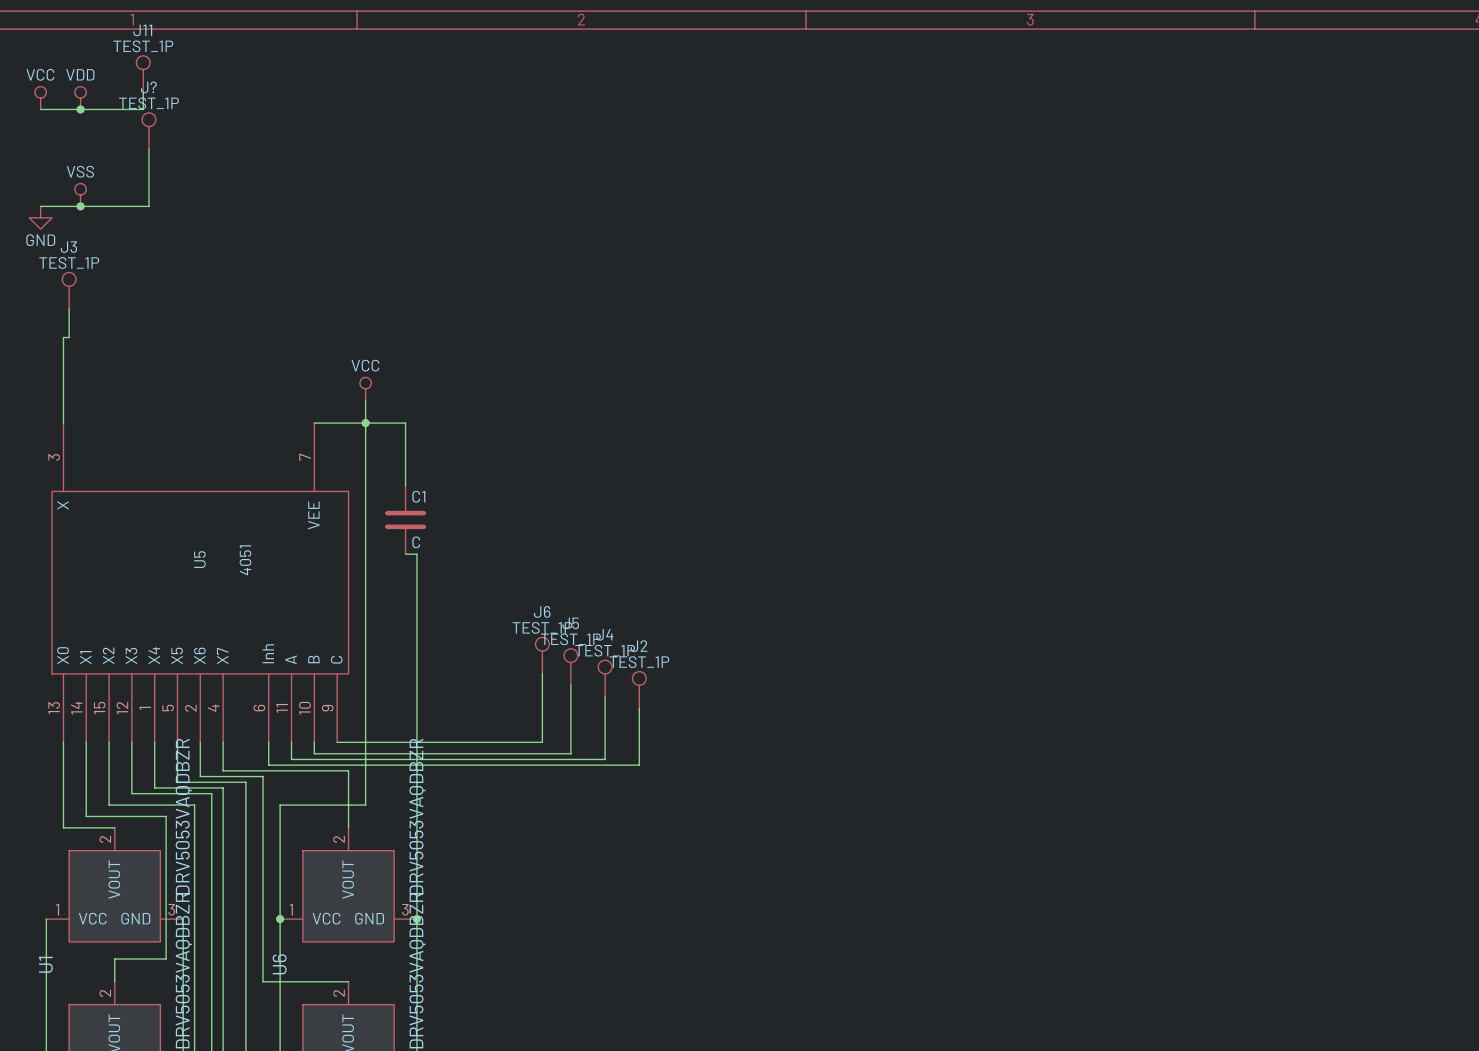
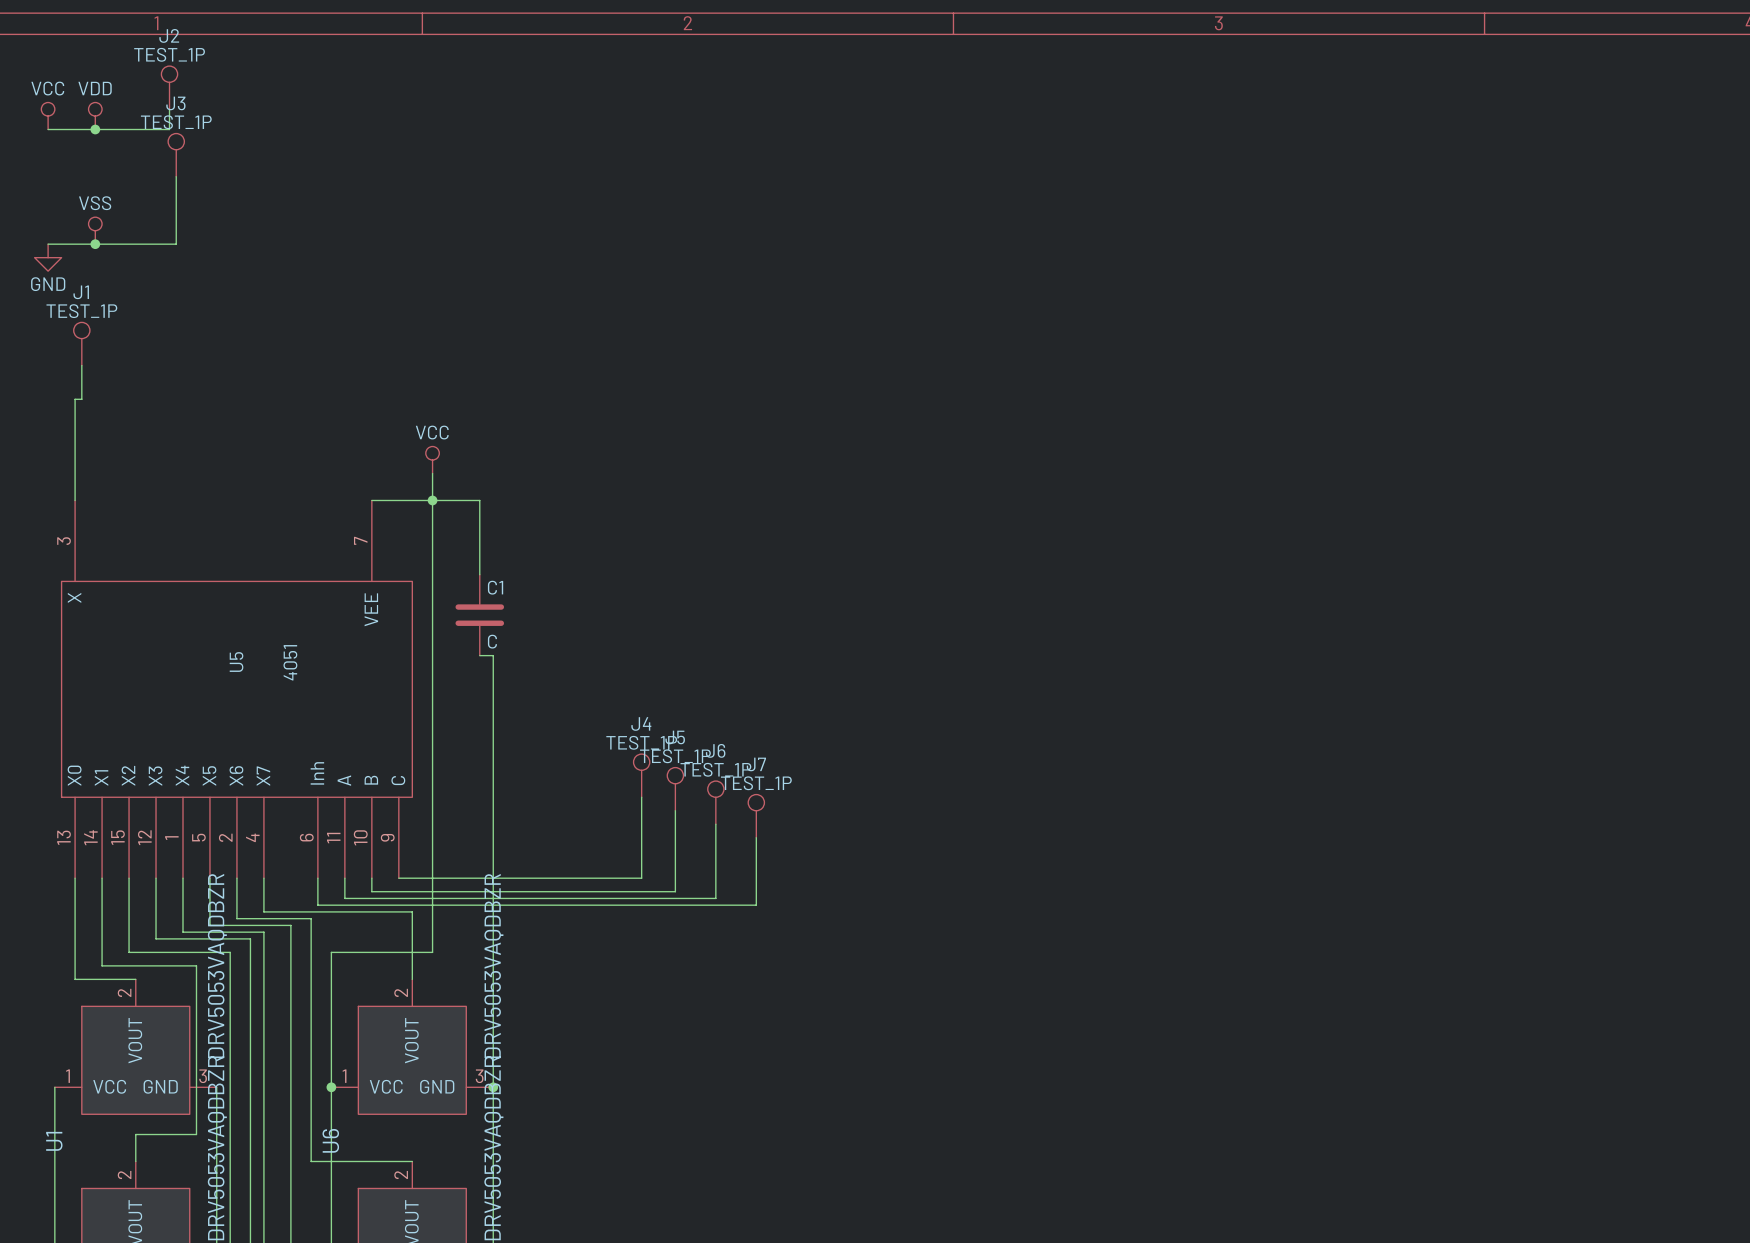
J11 name: J11 (142, 30) -> J2 (169, 35)
J? name: J? (148, 87) -> J3 (175, 103)
J3 name: J3 (68, 247) -> J1 (81, 292)
J6 name: J6 (542, 611) -> J4 (641, 723)
J4 name: J4 (604, 634) -> J6 (715, 750)
J2 name: J2 (639, 646) -> J7 (756, 764)

